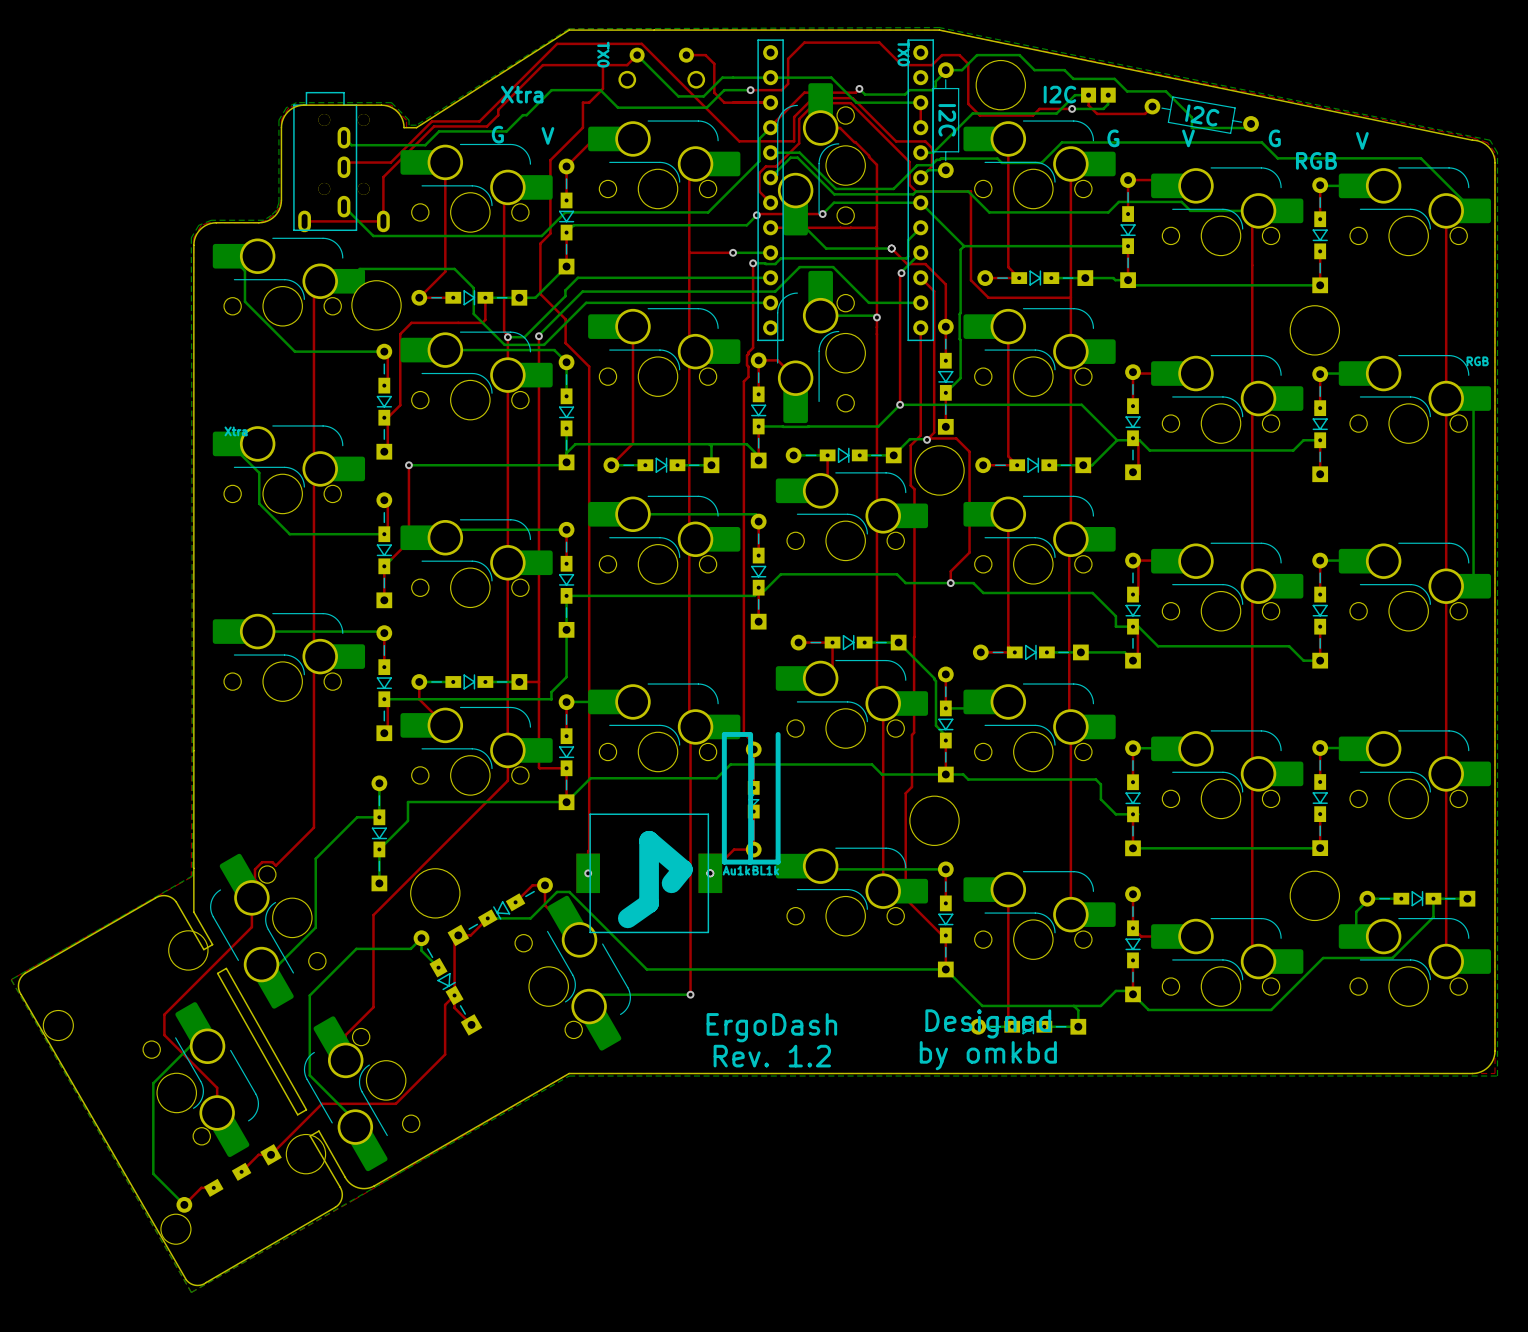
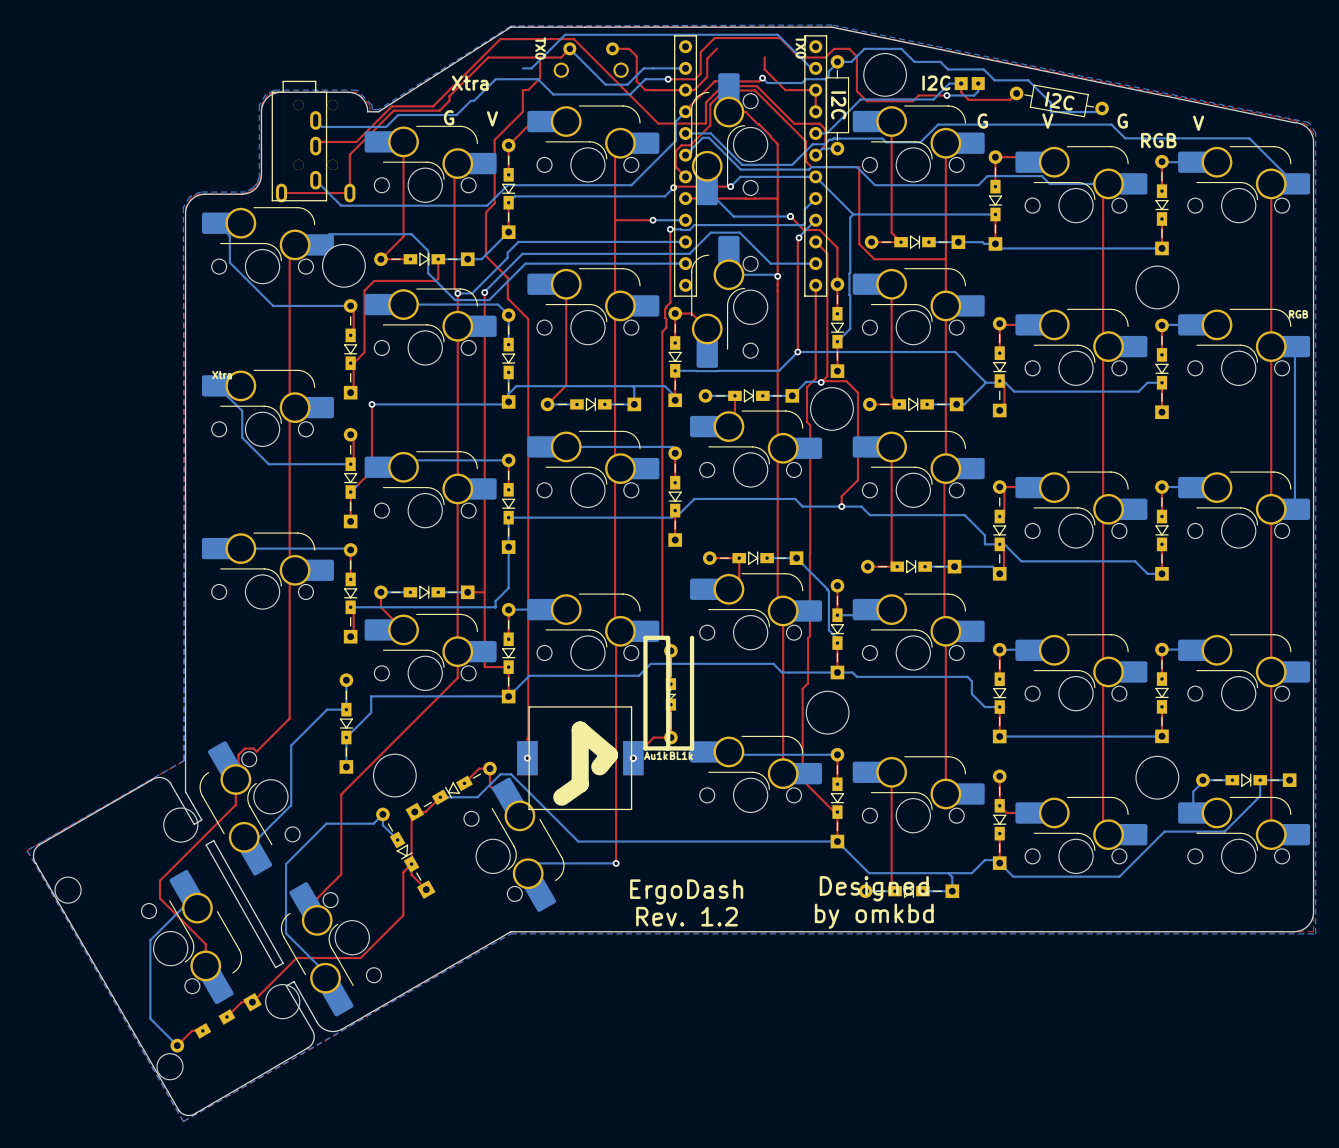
top track: none -> (717, 48) (707, 58) (707, 77) (694, 90) (685, 90)
top track: none -> (764, 57) (764, 69) (785, 90) (815, 90)
bottom track: (770, 77) (831, 77) (856, 102) (920, 102) -> none
bottom track: none -> (811, 68) (777, 34) (565, 34) (531, 68) (522, 68)

